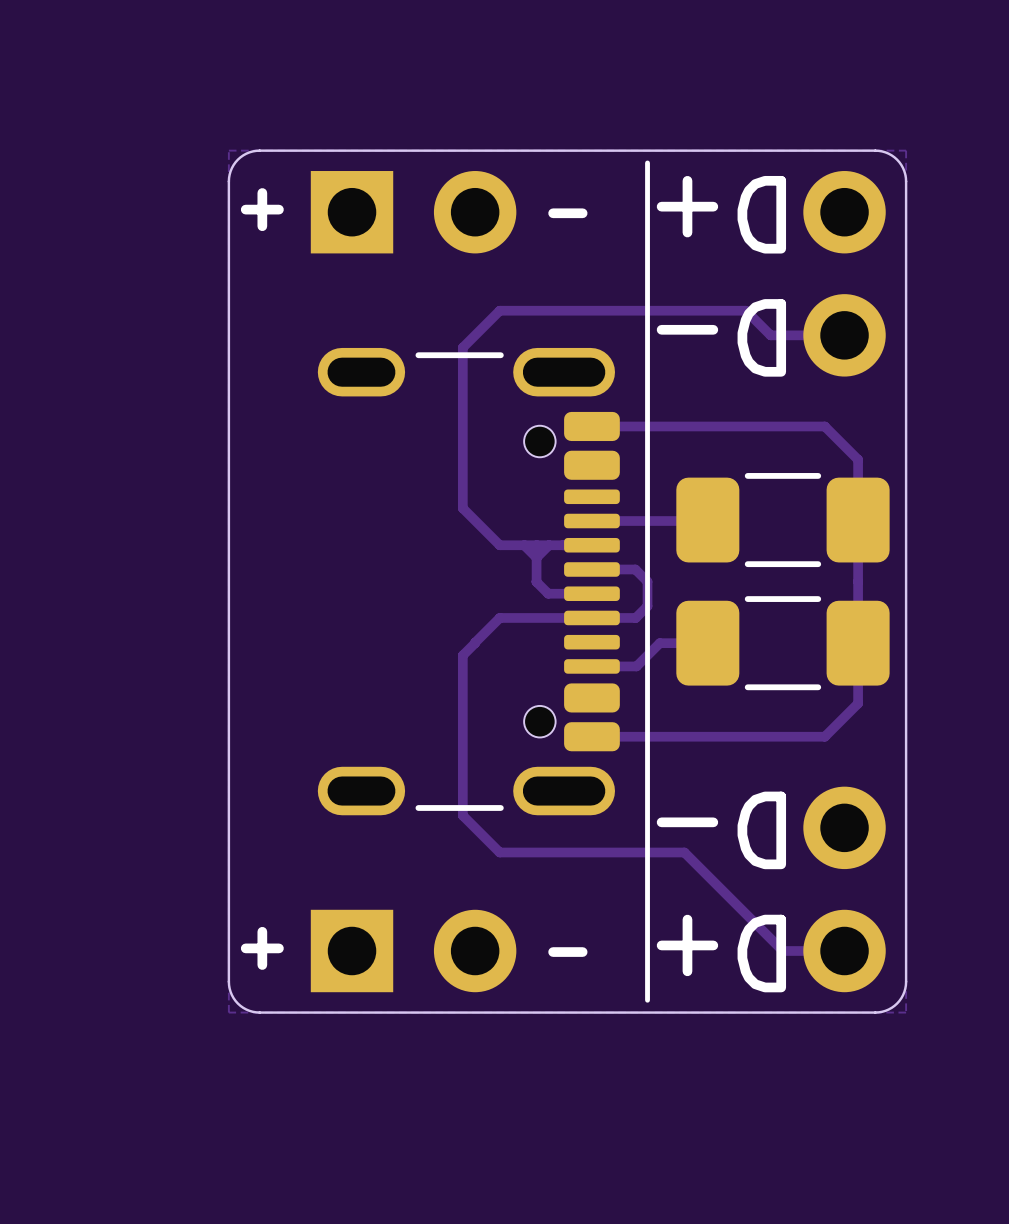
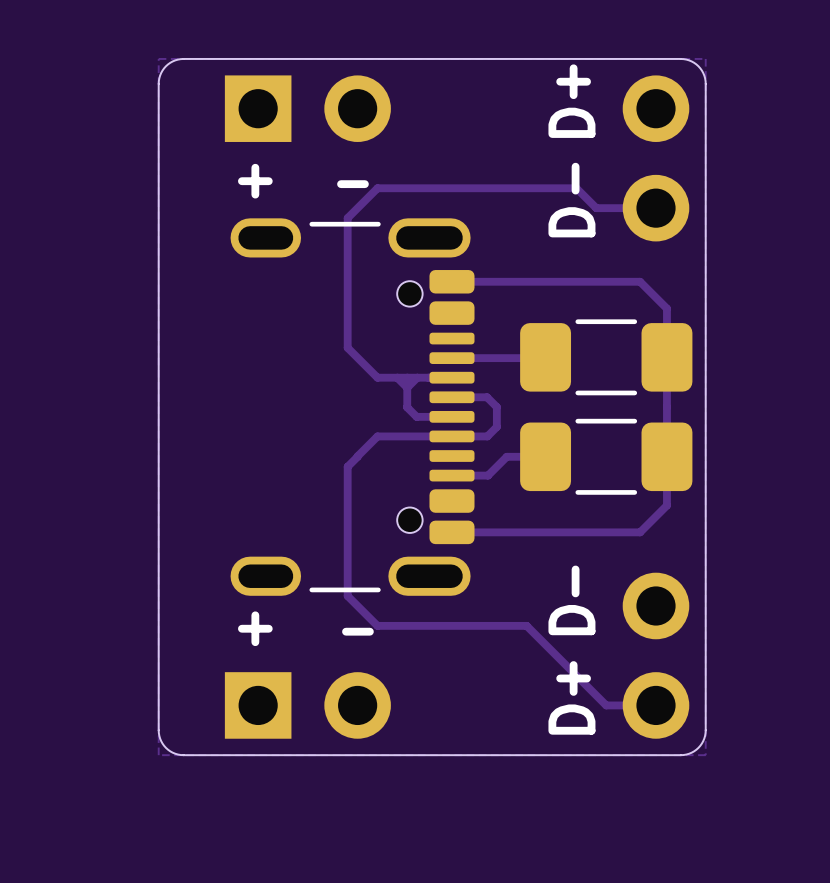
line: (647, 162) (647, 1000) -> none
text: none -> + (573, 81)
text position: + (262, 209) -> + (255, 181)
text: - (567, 213) -> none
text: D+ (721, 214) -> none
text: none -> D (571, 122)
text: none -> - (575, 178)
text: none -> - (352, 184)
text: D- (721, 337) -> none
text: none -> D (571, 222)
text: none -> - (575, 581)
text: D- (721, 830) -> none
text: none -> D (571, 620)
text: none -> - (357, 631)
text: none -> + (573, 678)
text position: + (262, 948) -> + (255, 628)
text: - (567, 952) -> none
text: D+ (721, 953) -> none
text: none -> D (571, 719)

